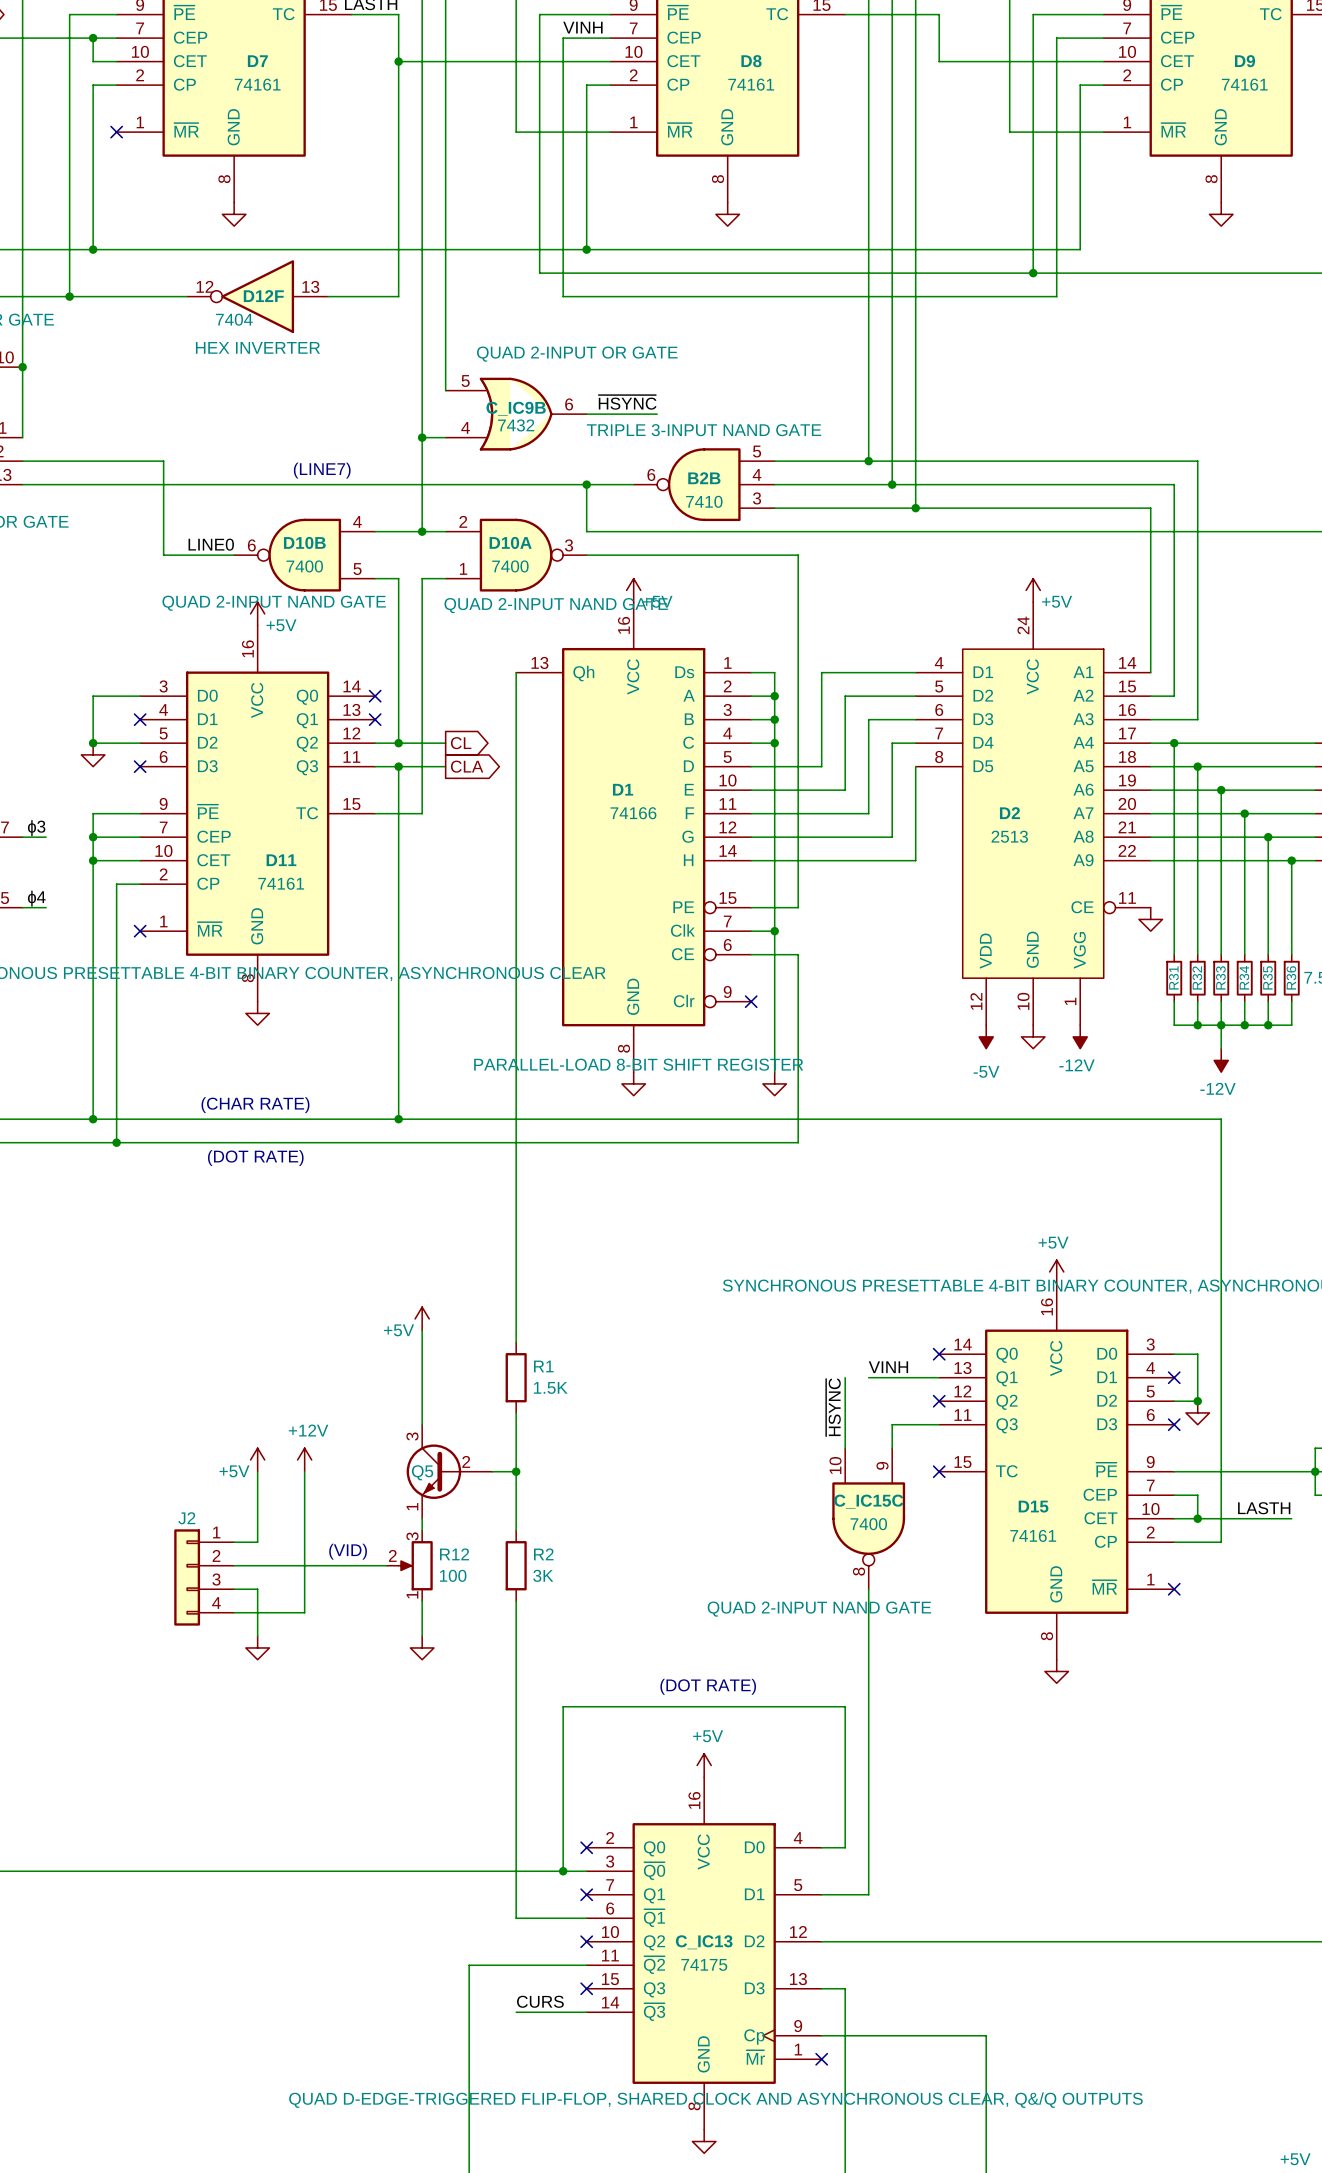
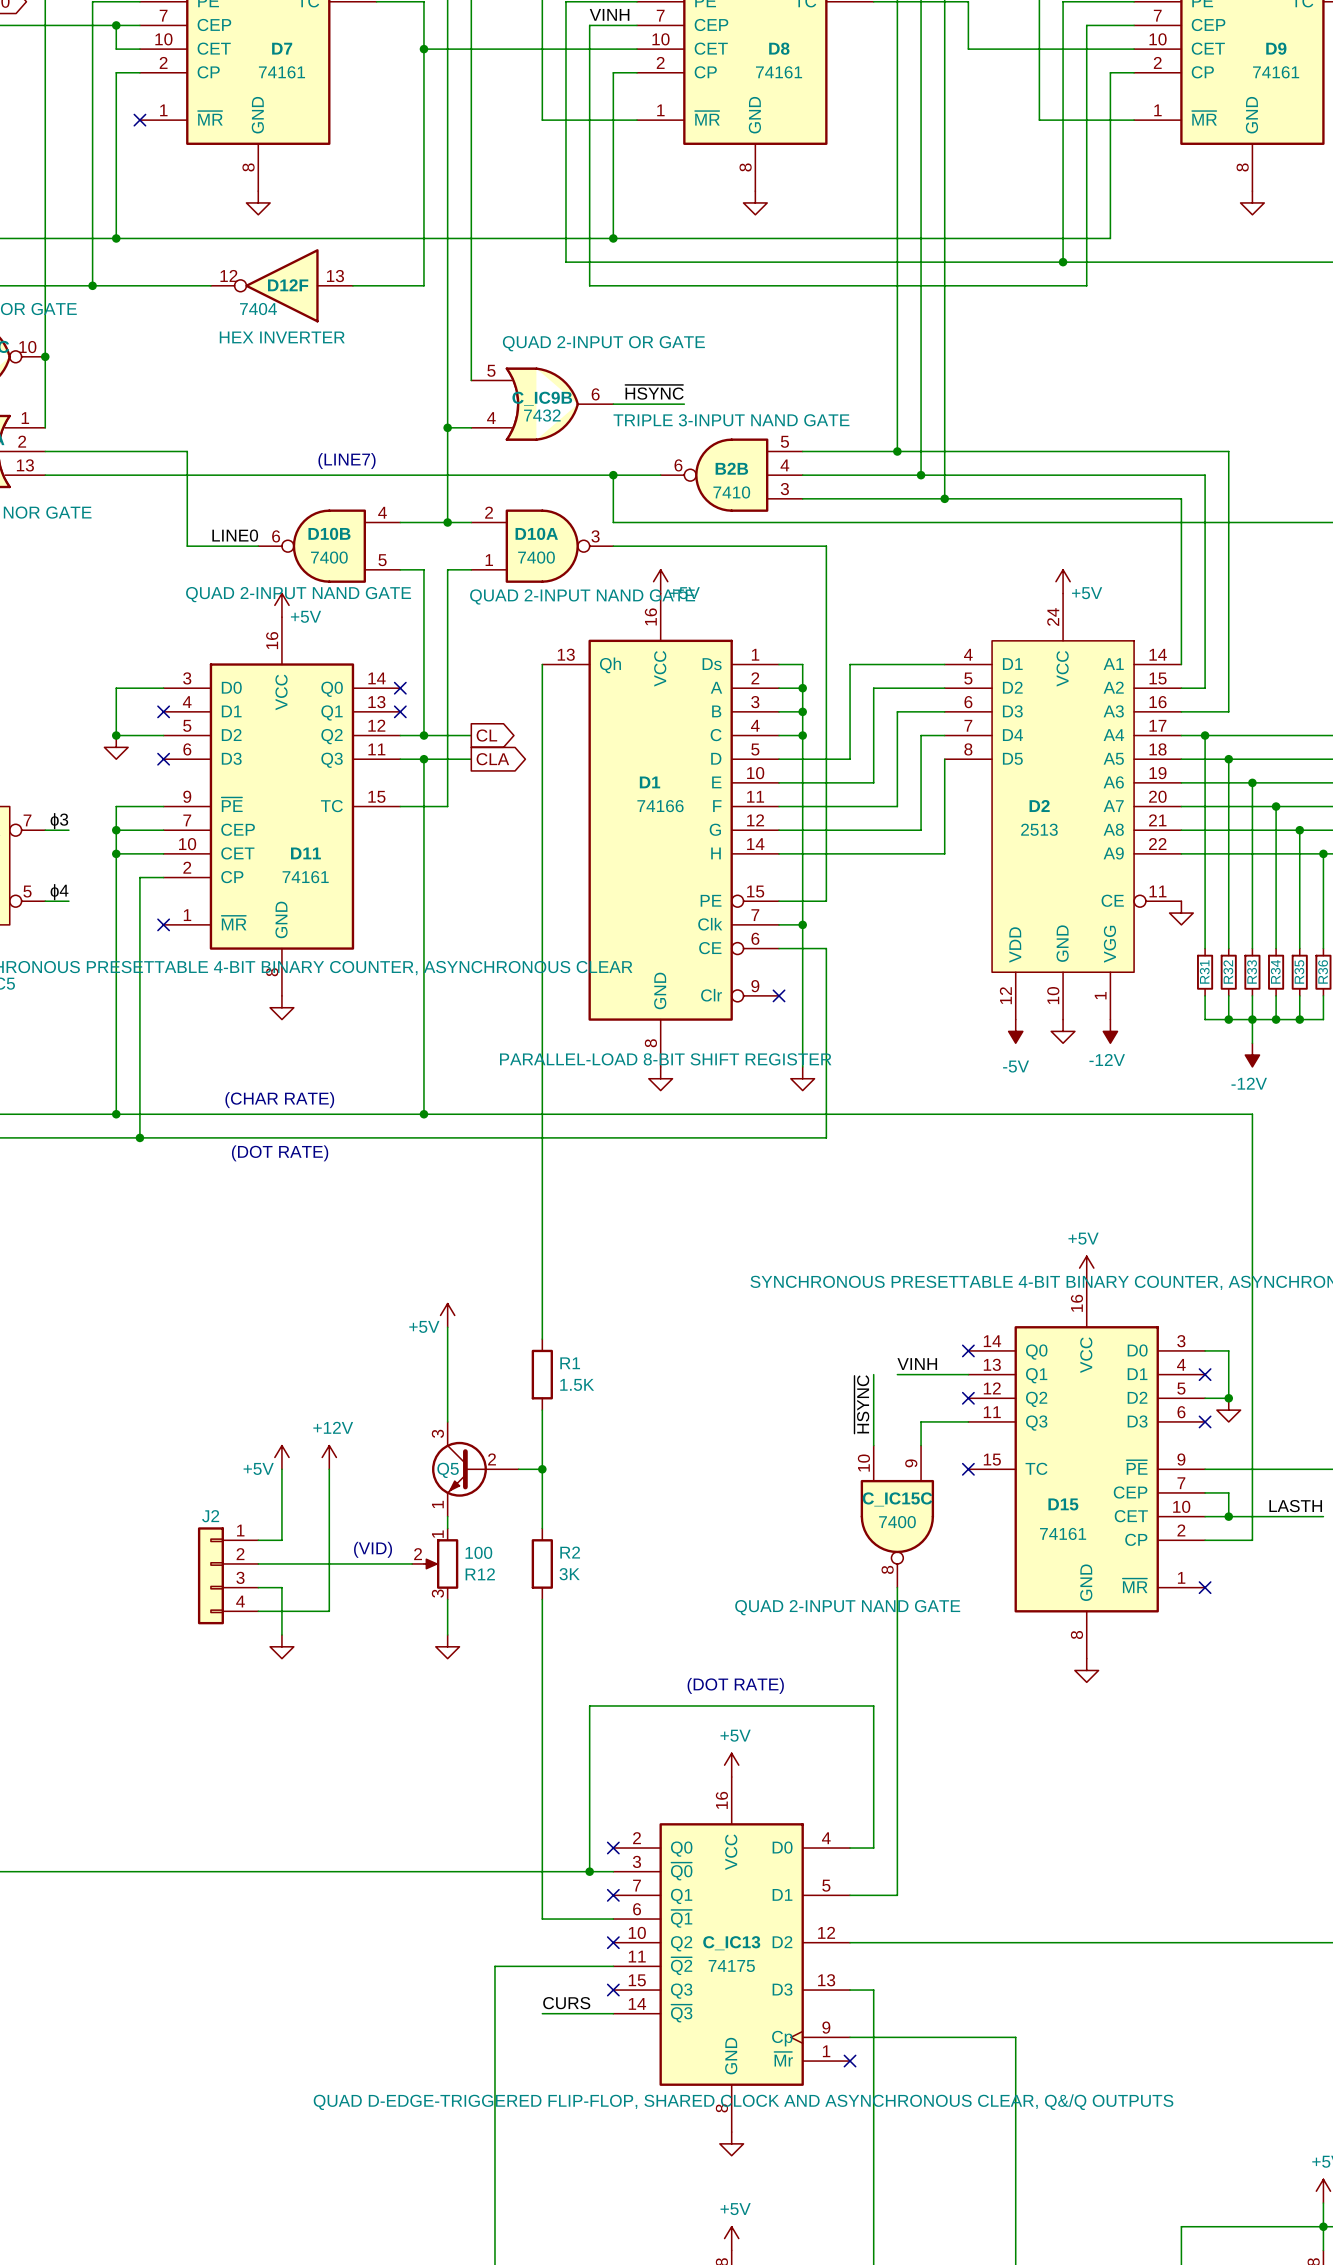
R12 flip: as is (415, 1565) -> up-down (441, 1563)

